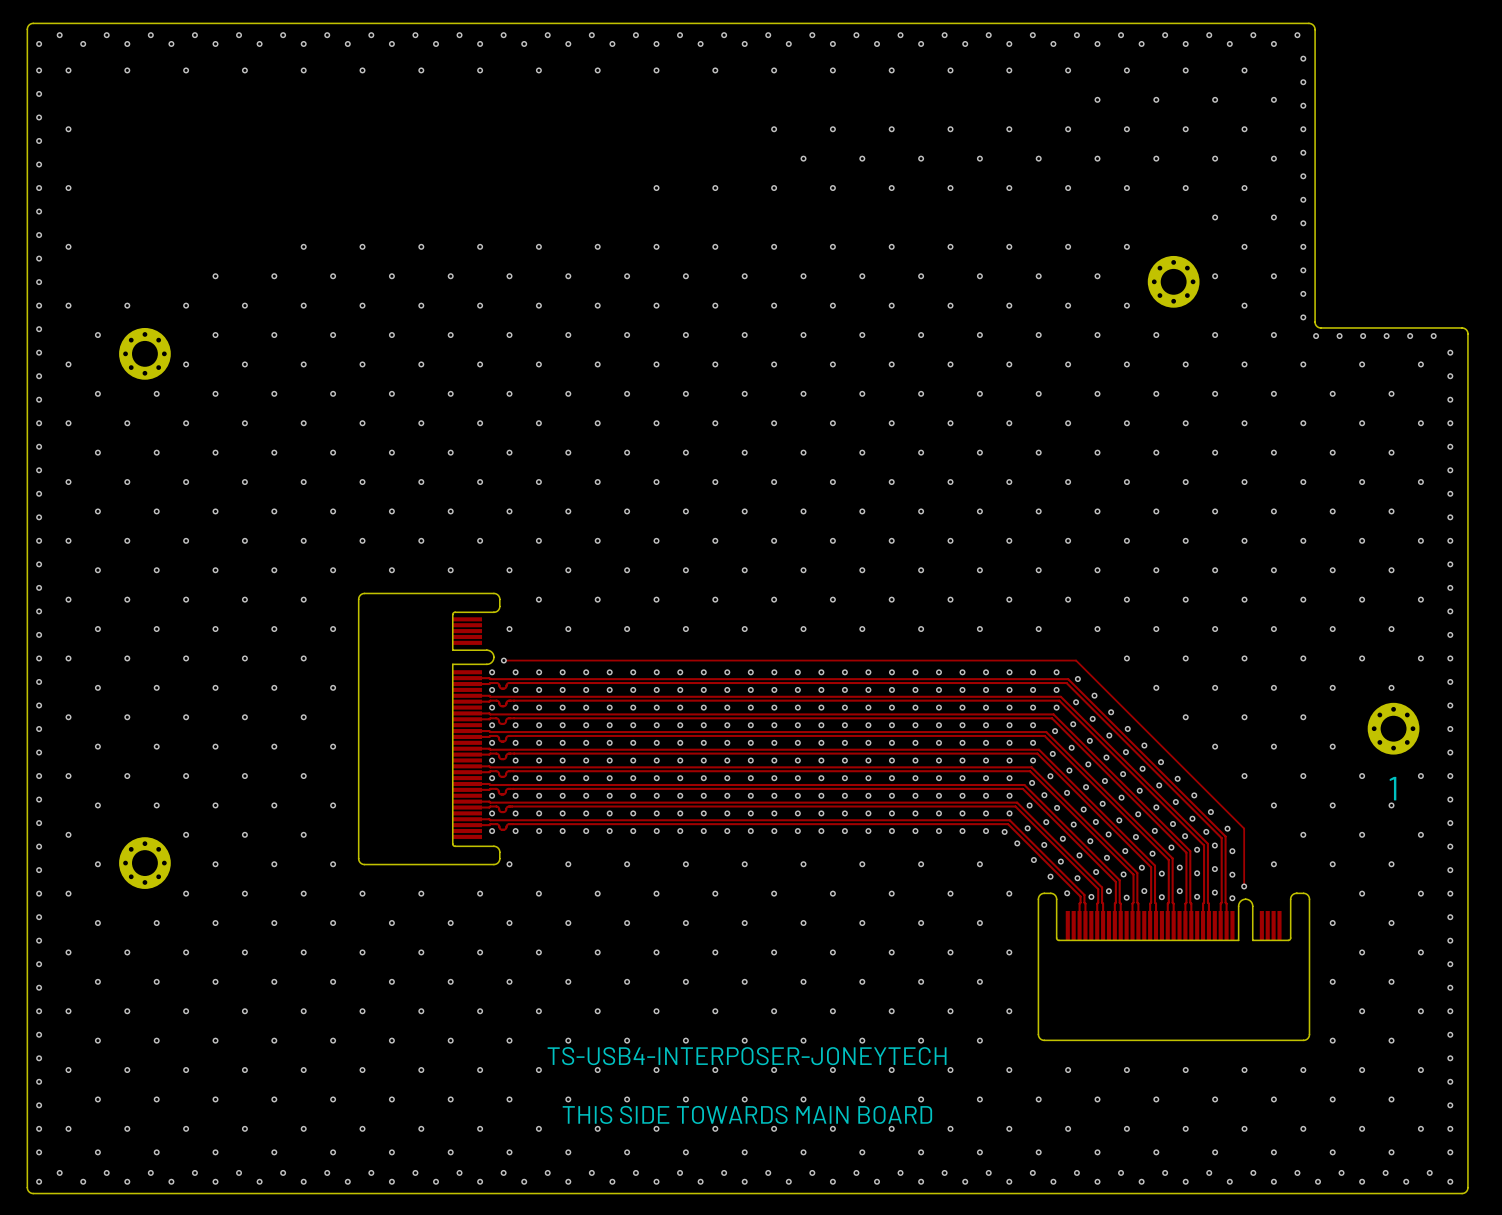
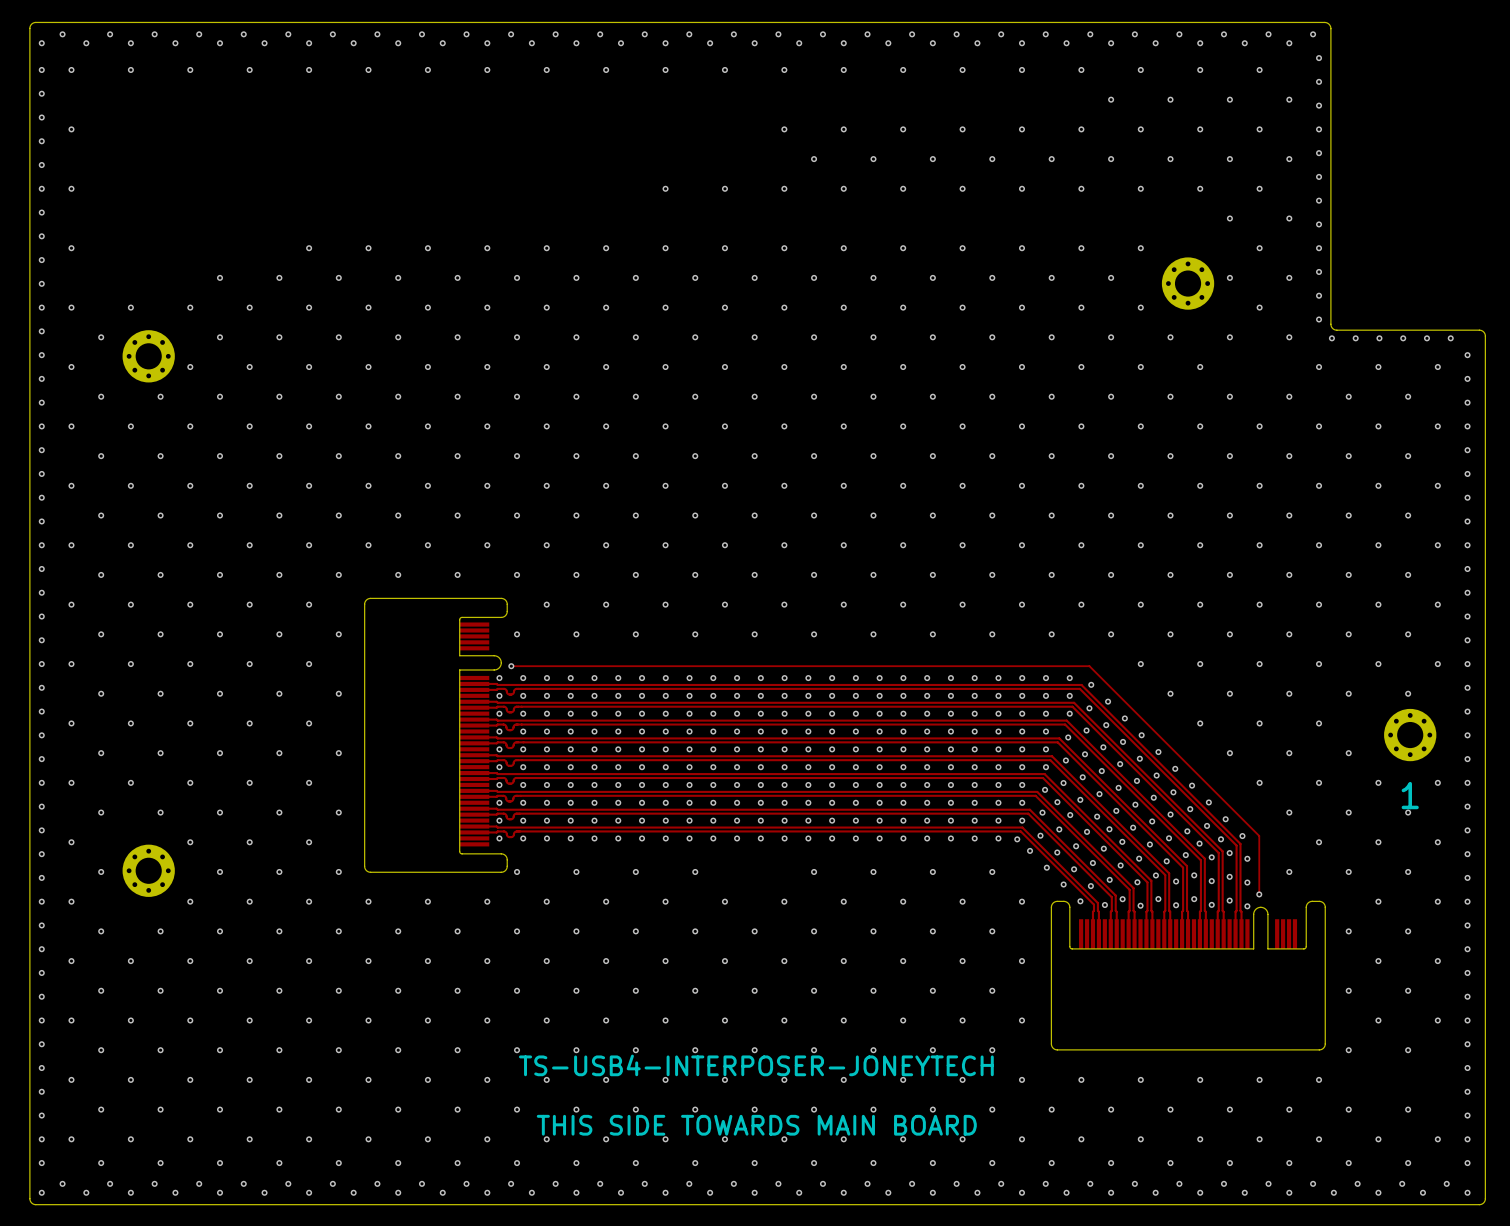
via: (1244, 364) -> none
via: (744, 864) -> none
via: (1362, 1070) -> none
via: (1420, 1070) -> none

